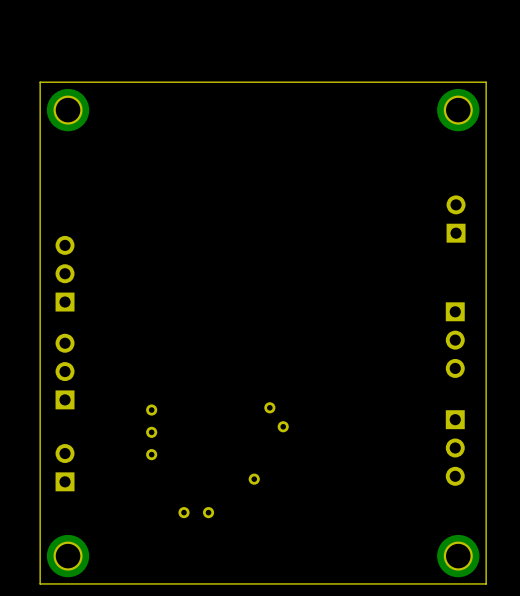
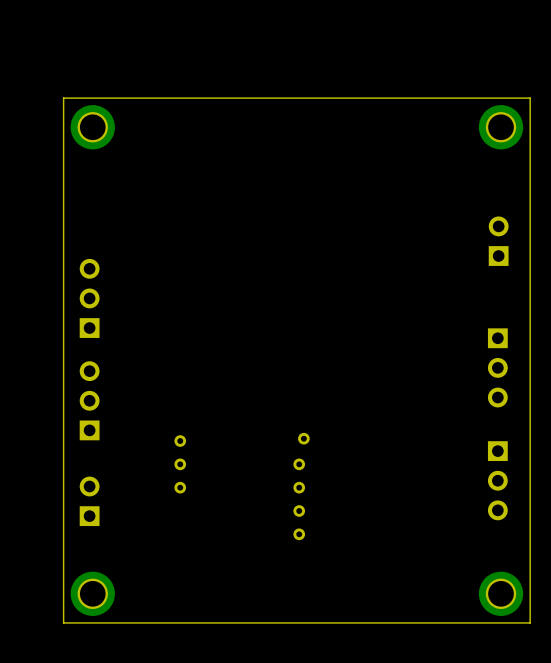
part: (283, 426) -> none
part: none -> (299, 464)
part: none -> (299, 487)
part: none -> (299, 511)
part: (254, 479) -> none
part: none -> (299, 534)
part: (183, 512) -> none
part: (208, 512) -> none

